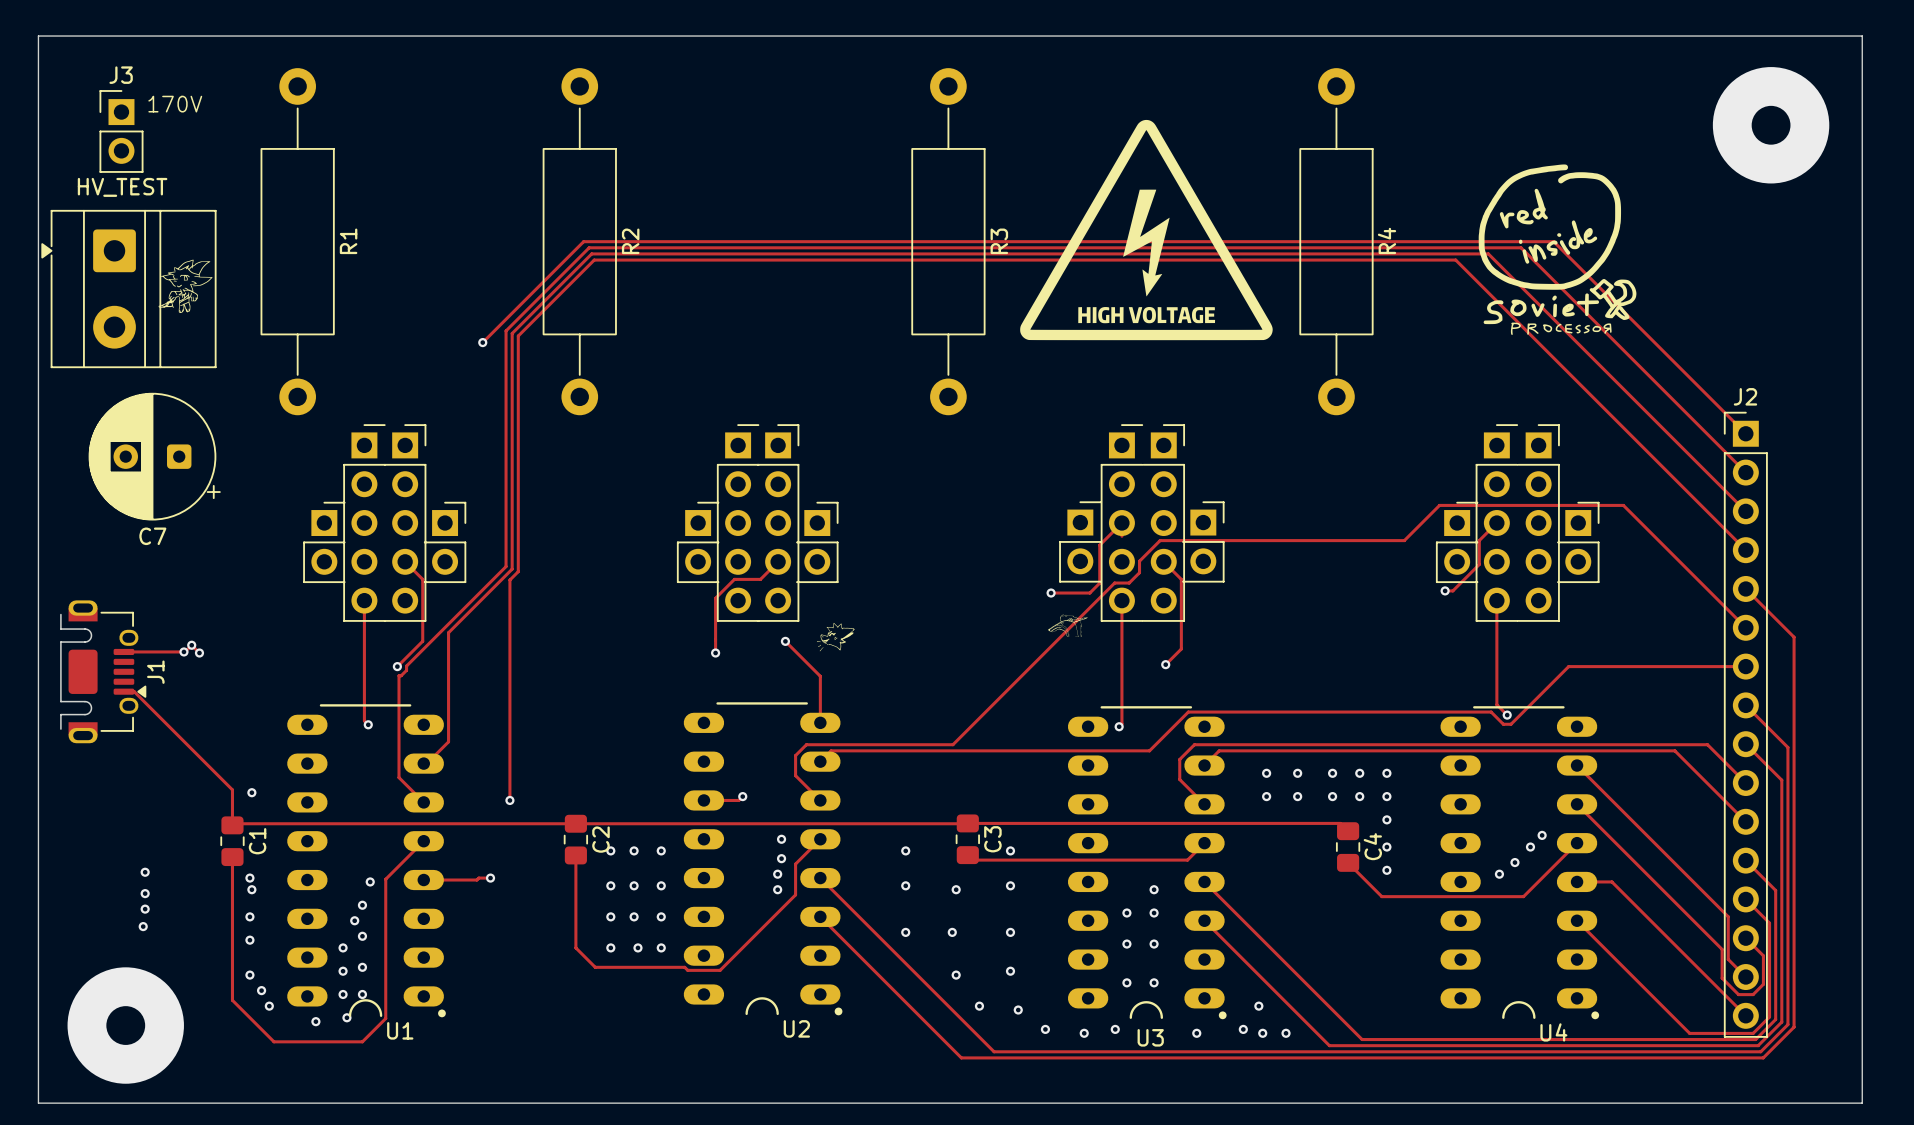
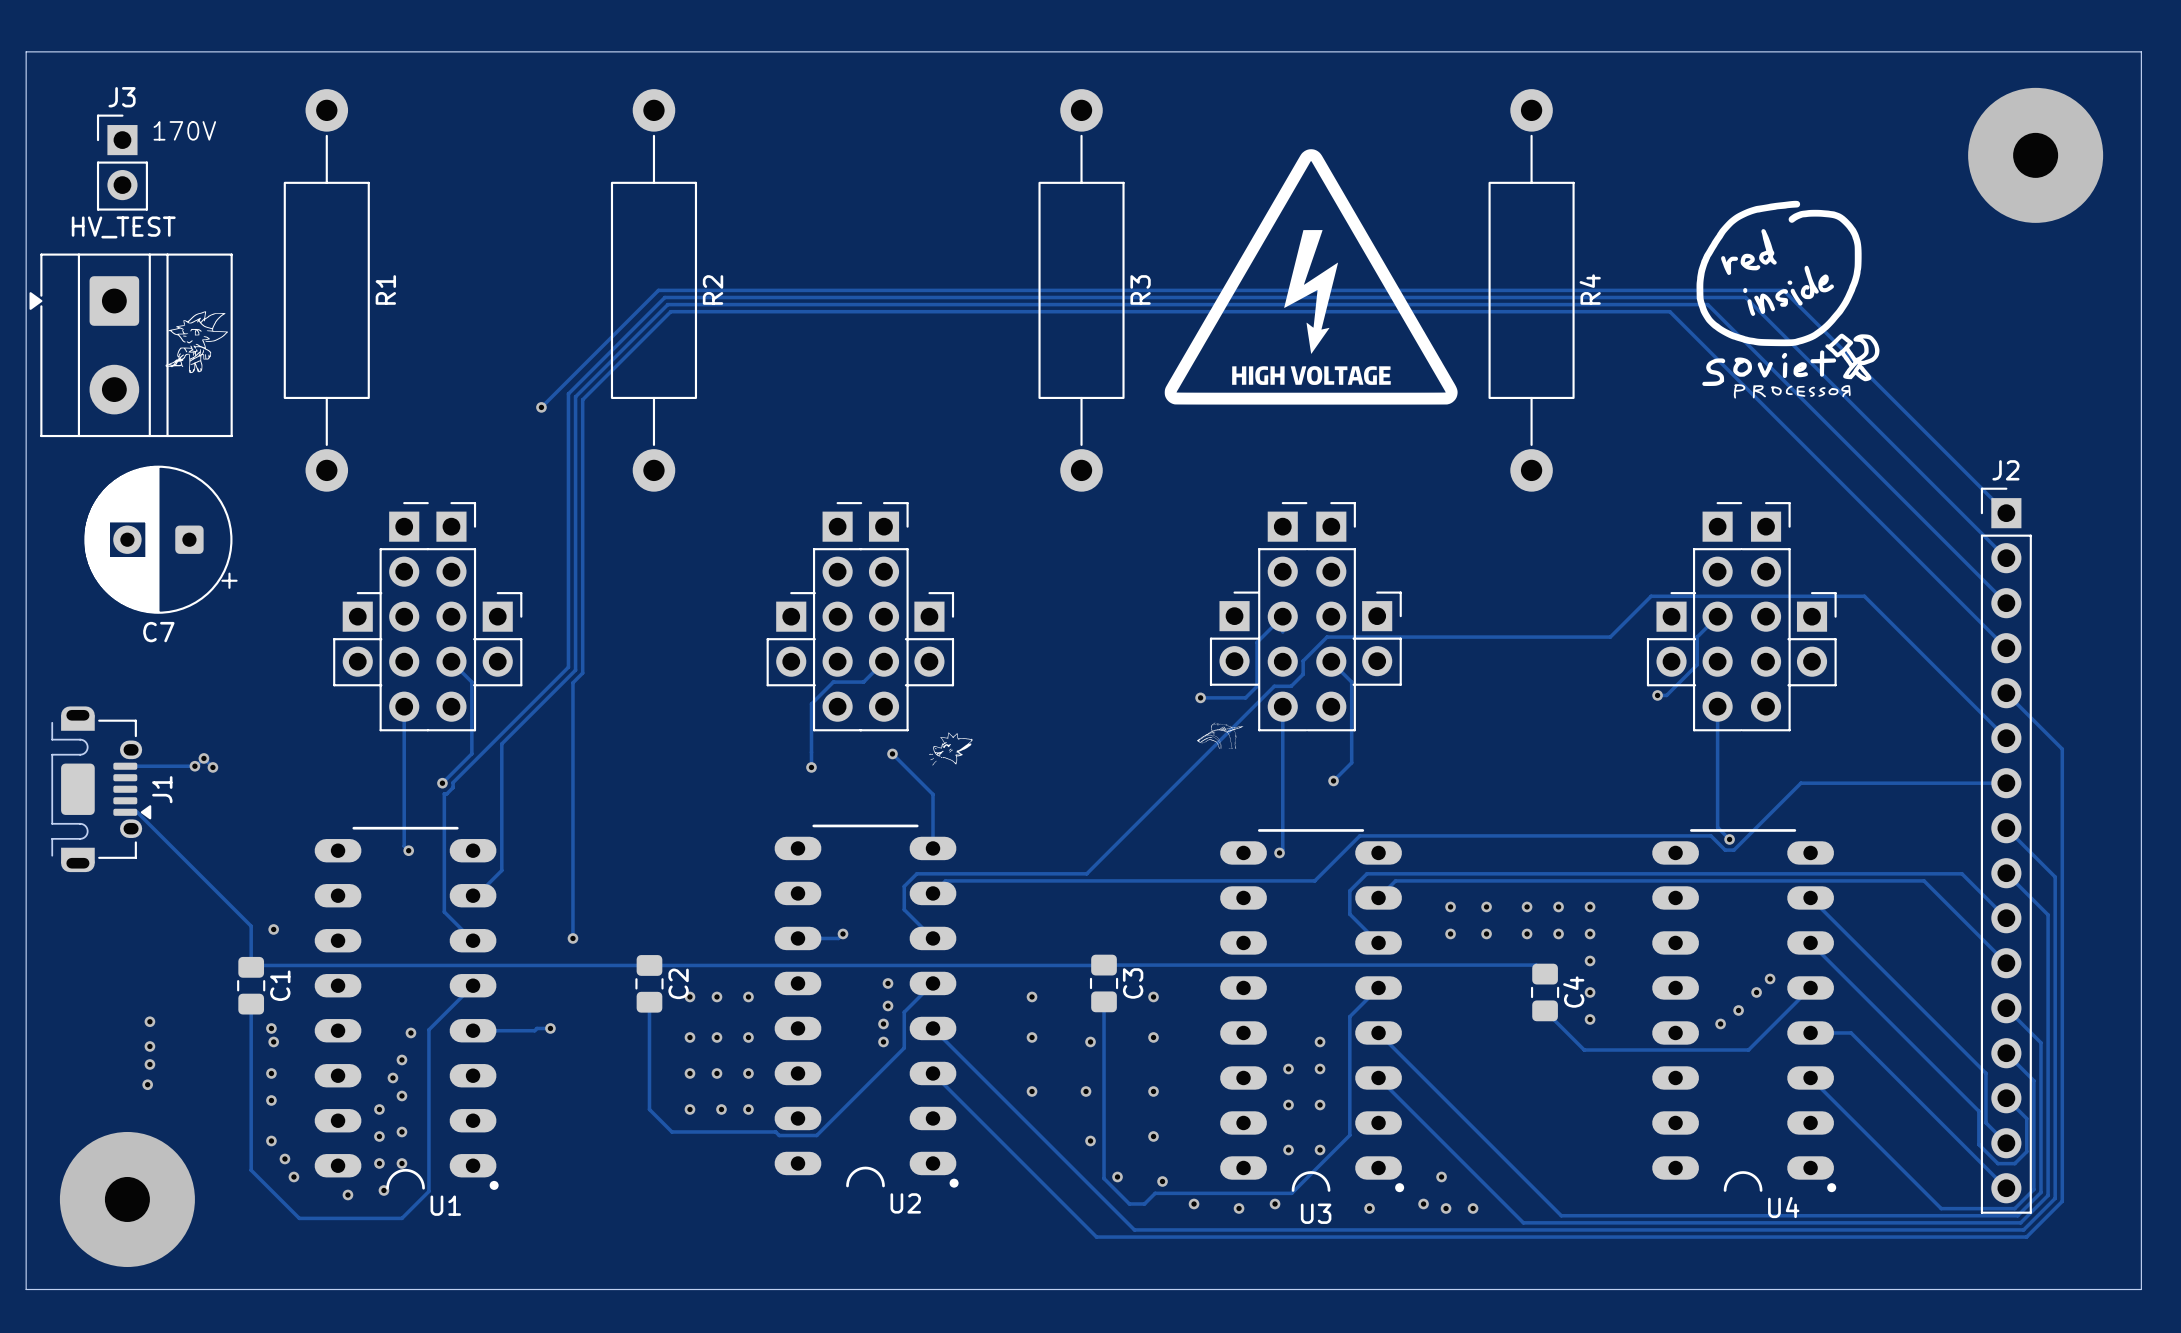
track: (972, 860) (1187, 860) -> (1104, 1001) (1104, 1178) (1129, 1203) (1144, 1203) (1155, 1193) (1291, 1193) (1349, 1135) (1349, 1016) (1358, 1007)

